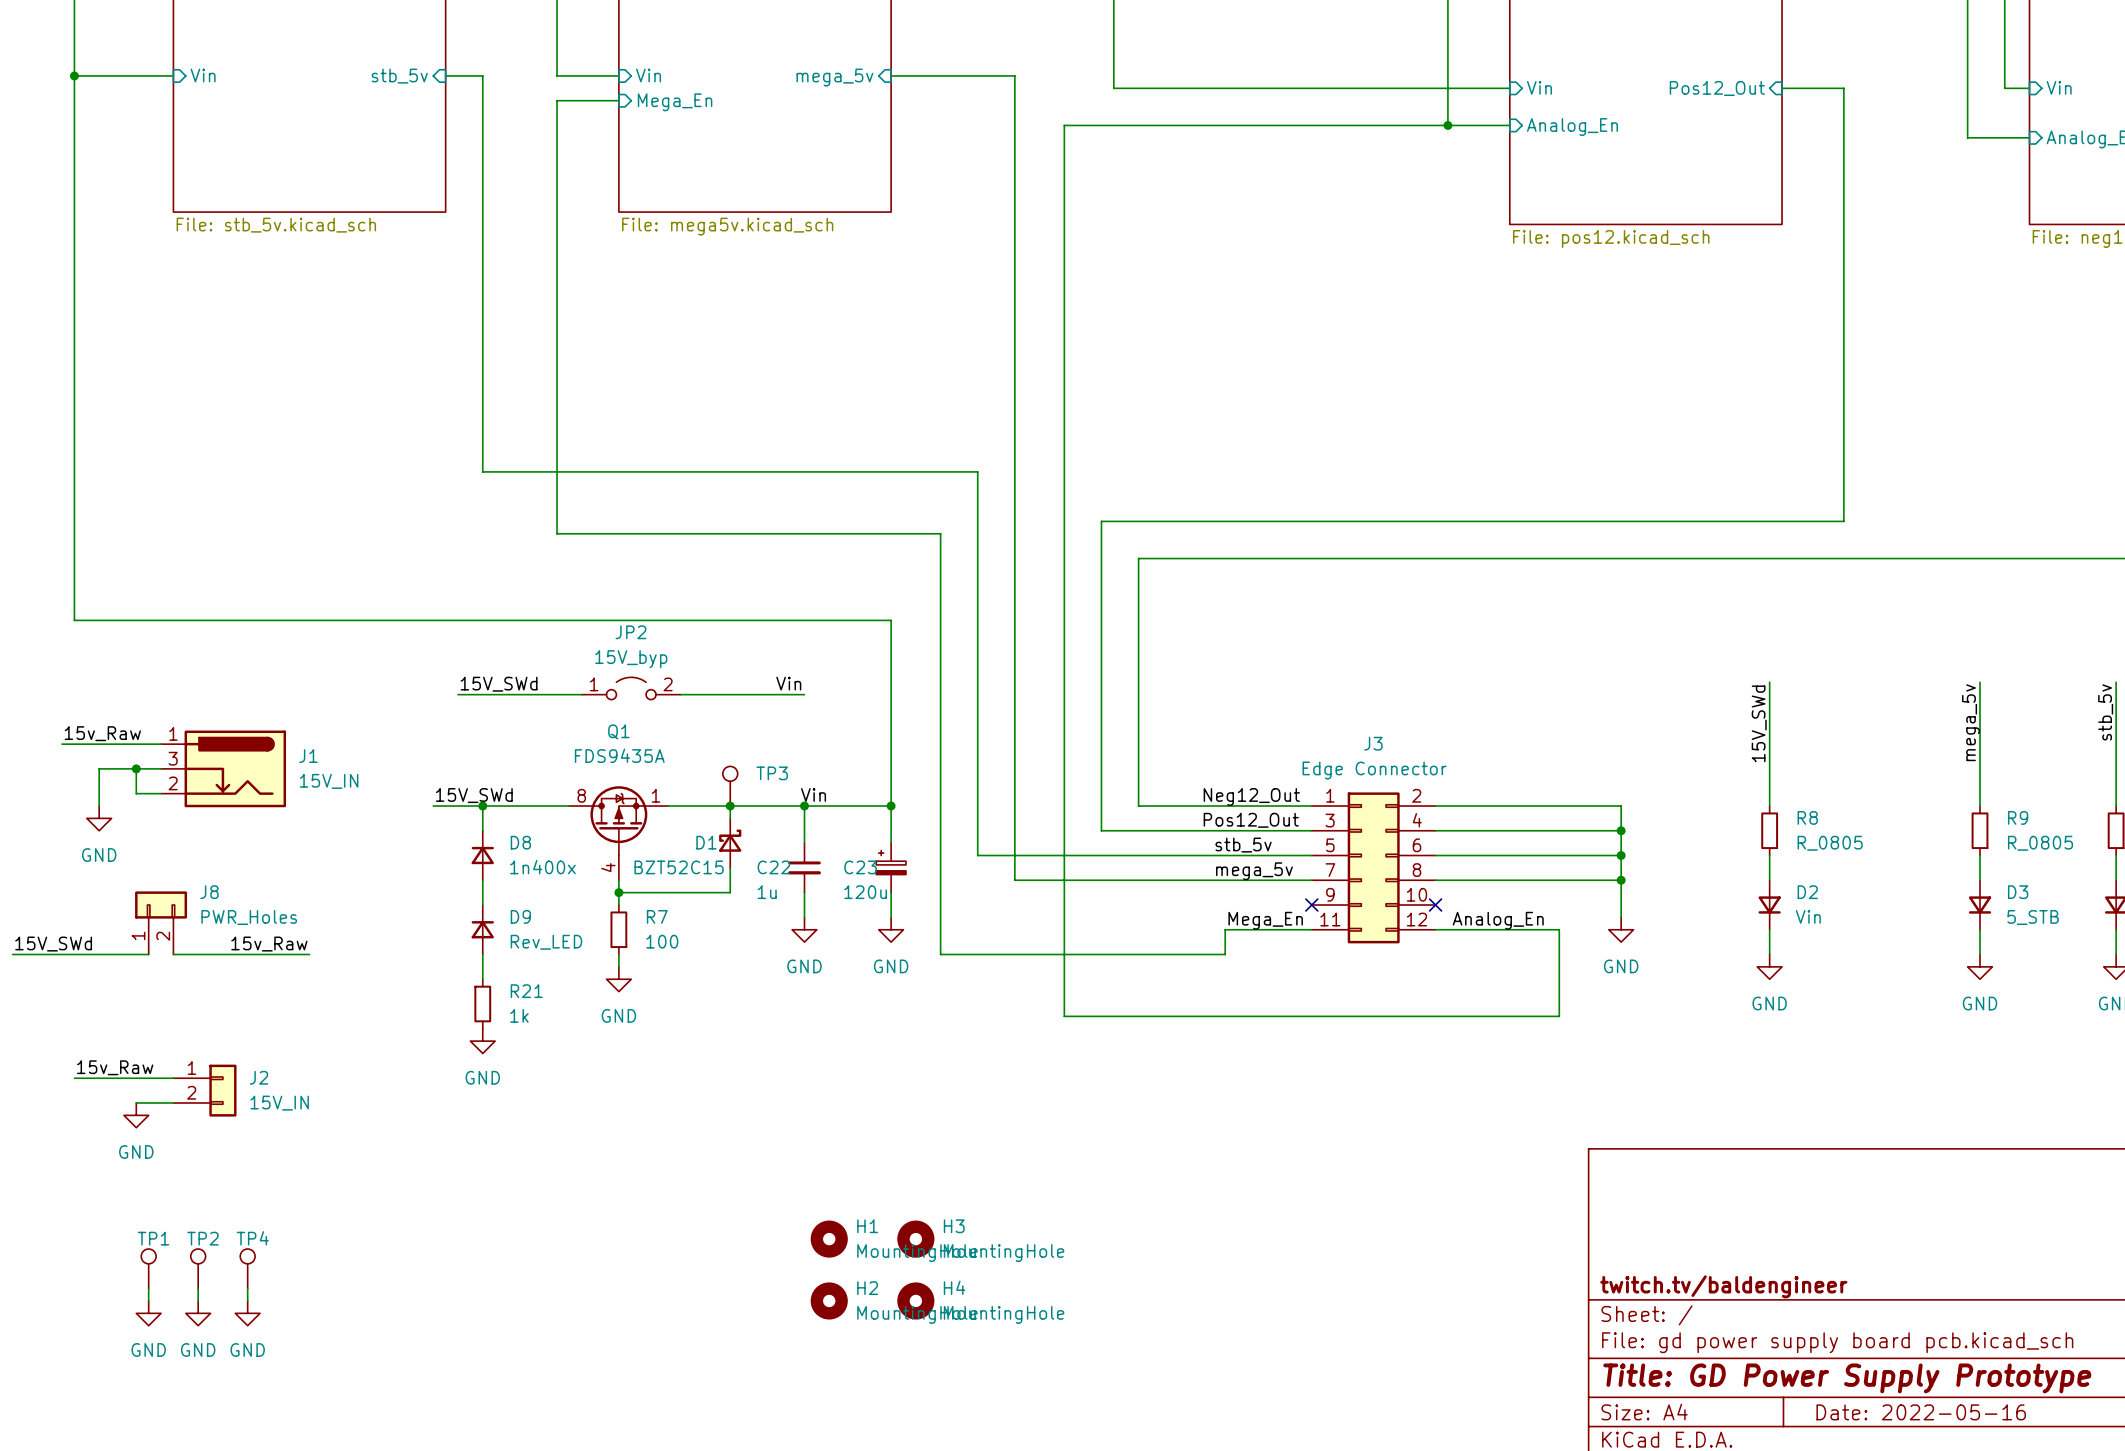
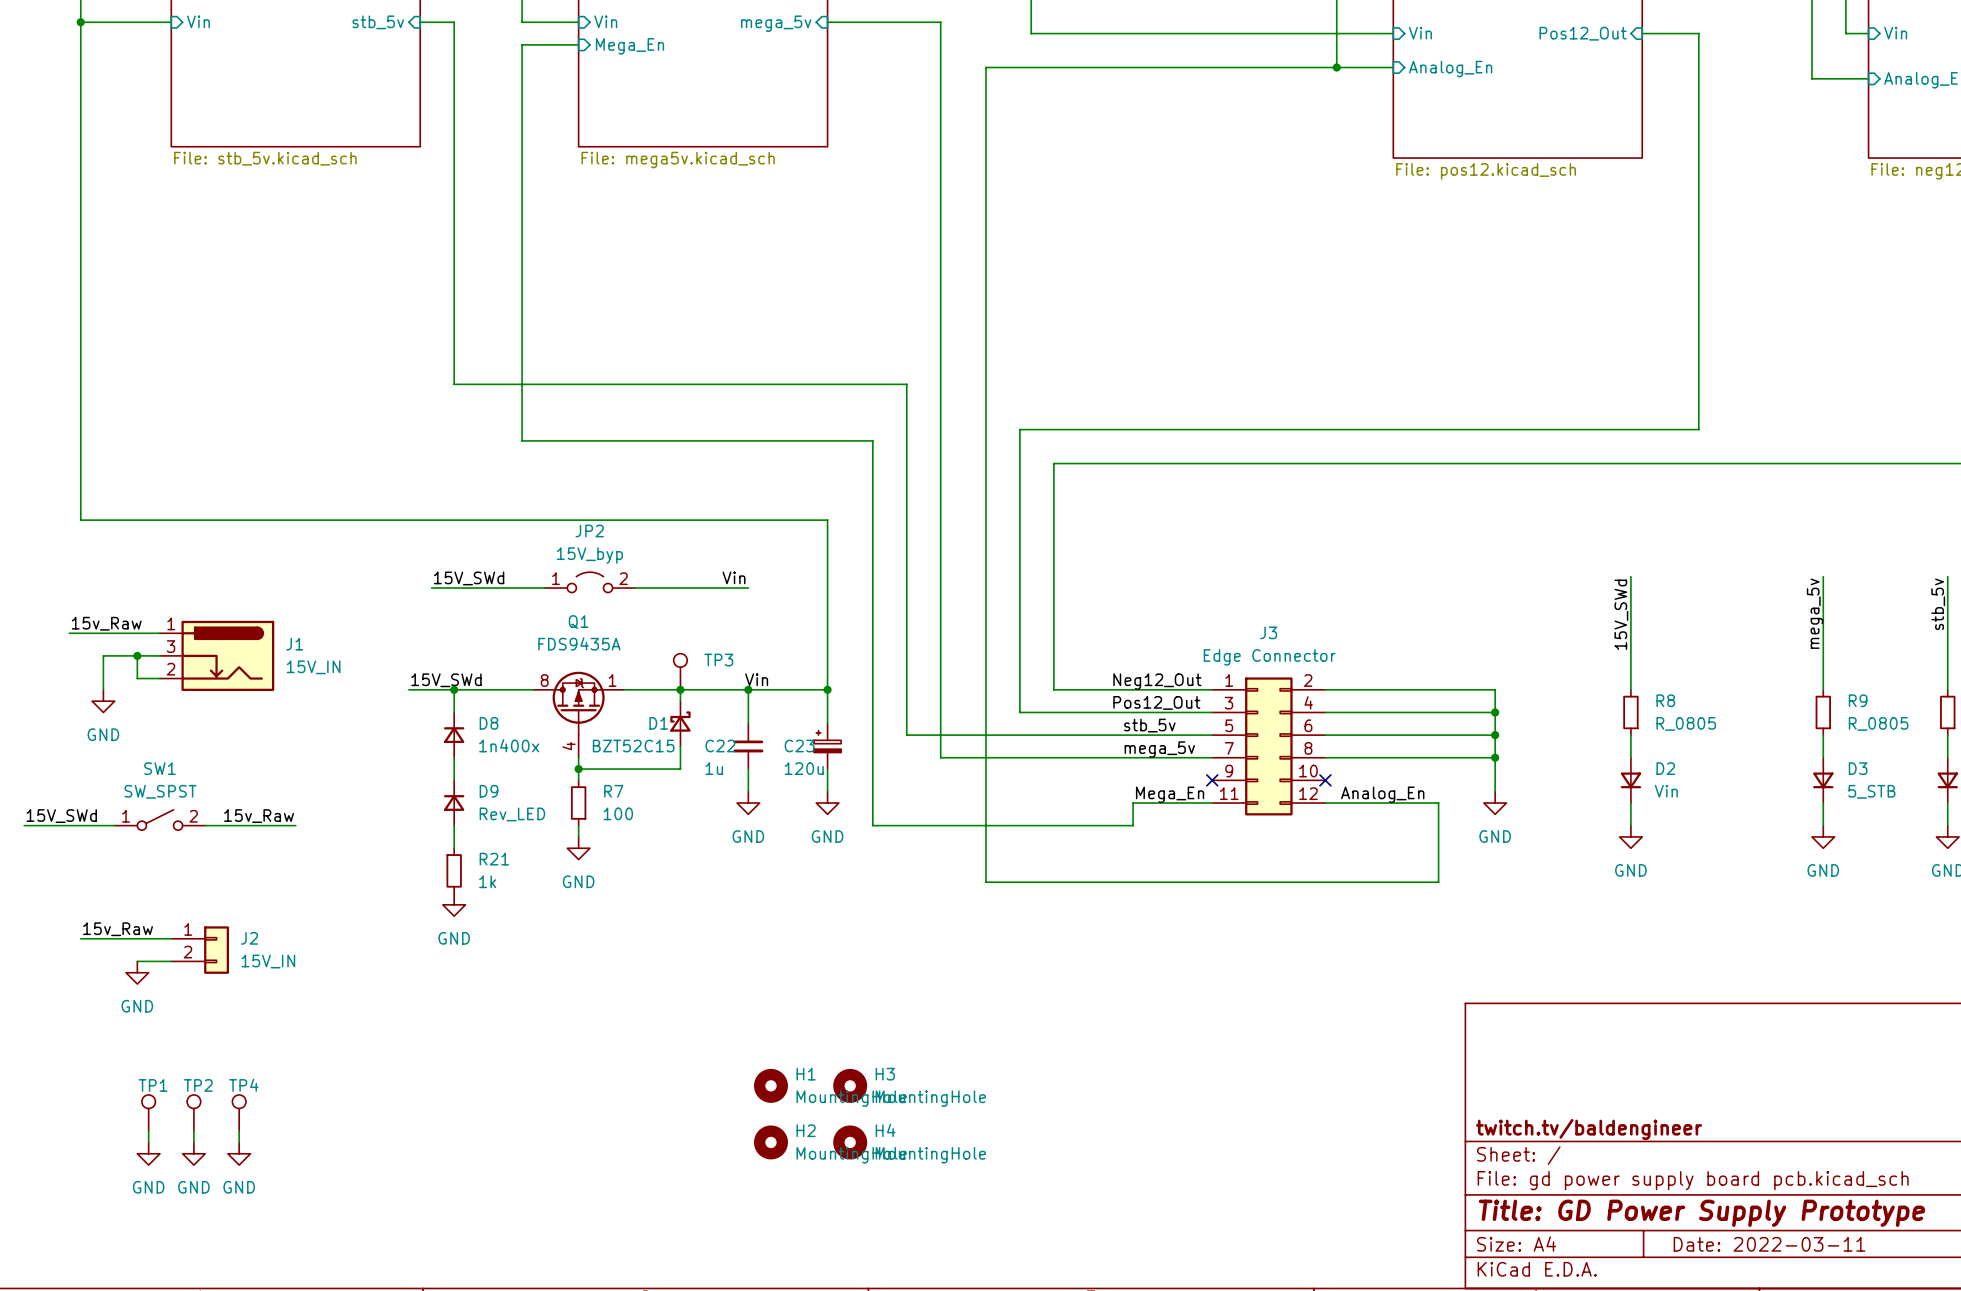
J8: PWR_Holes (161, 922) -> none
SW1: none -> SW_SPST (159, 819)
title block: Date: 2022-05-16 (1921, 1412) -> Date: 2022-03-11 (1769, 1244)

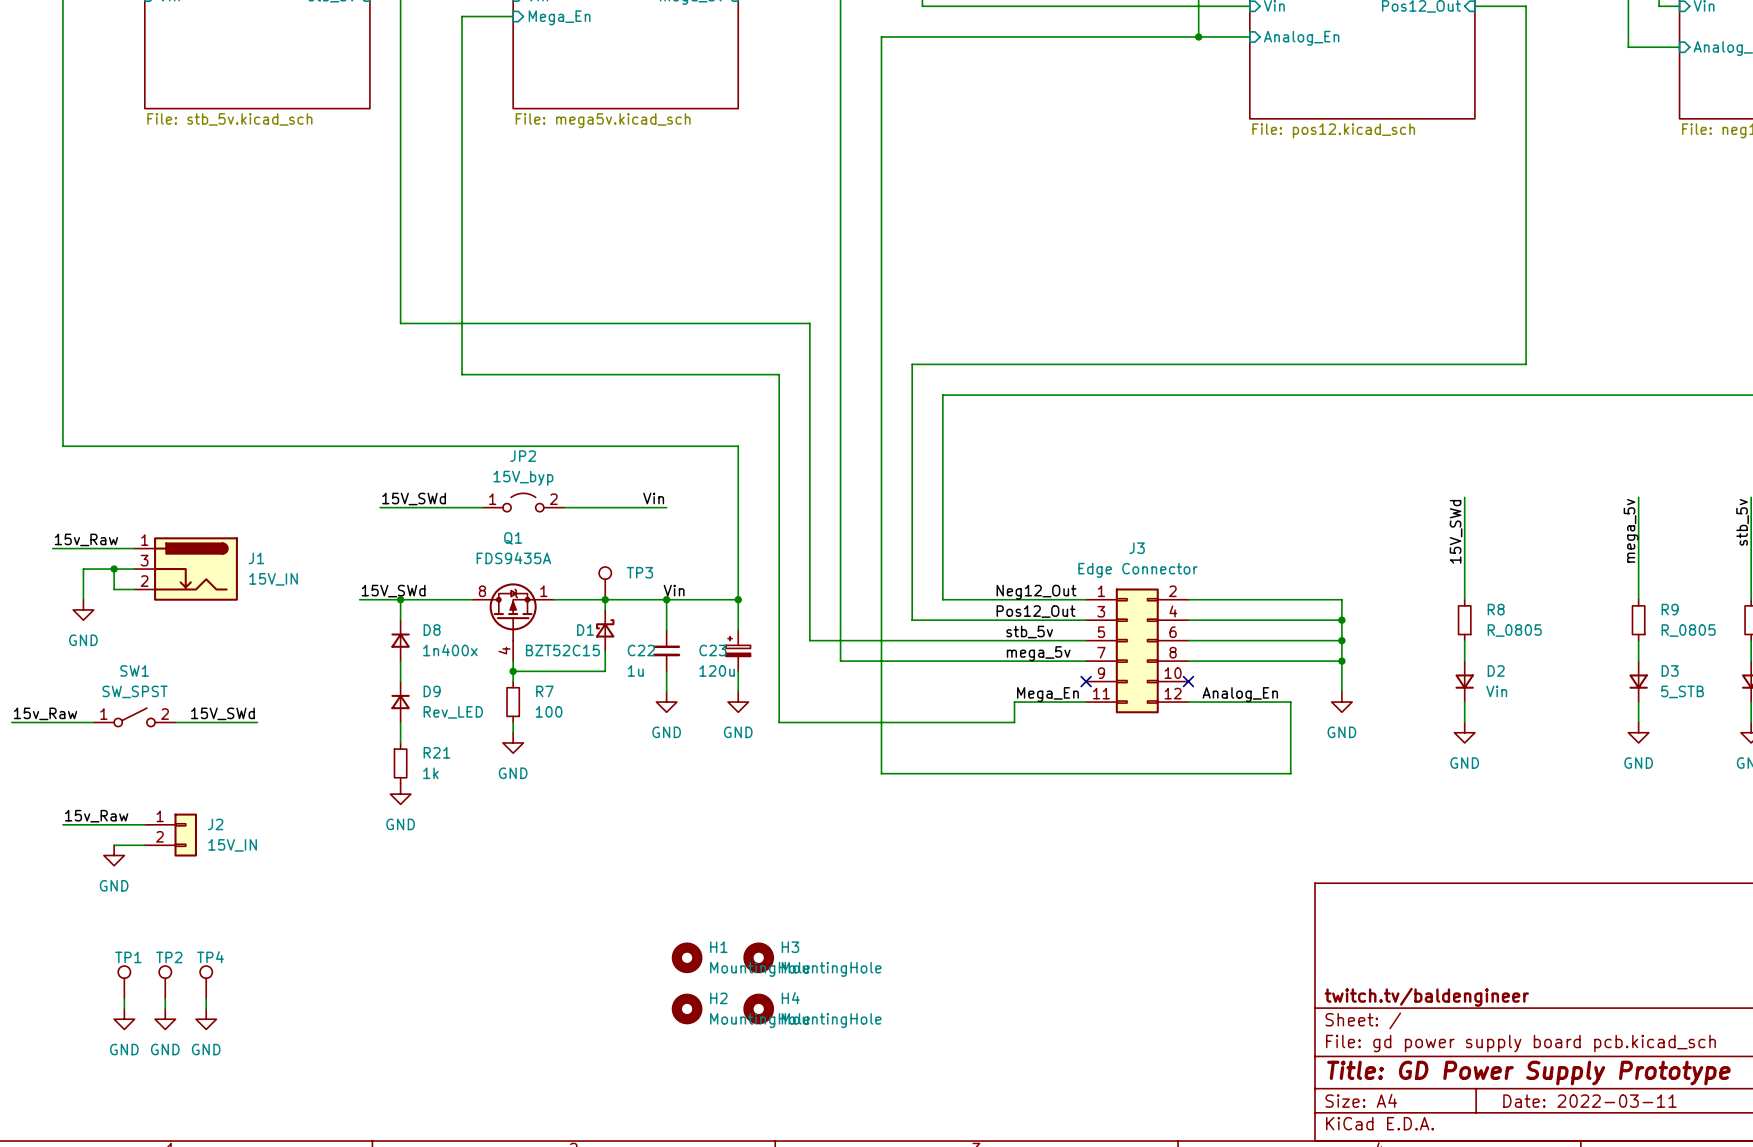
label: 15V_SWd (61, 816) -> 15v_Raw (45, 713)
label: 15v_Raw (259, 816) -> 15V_SWd (222, 713)

